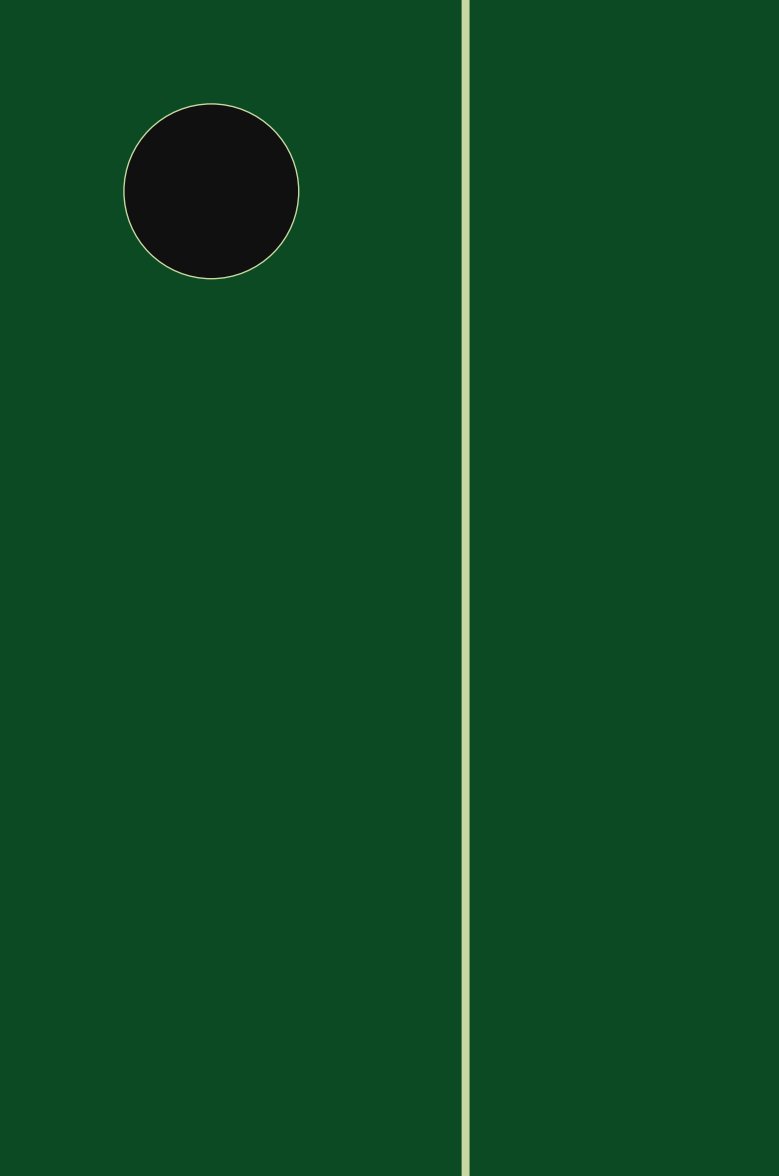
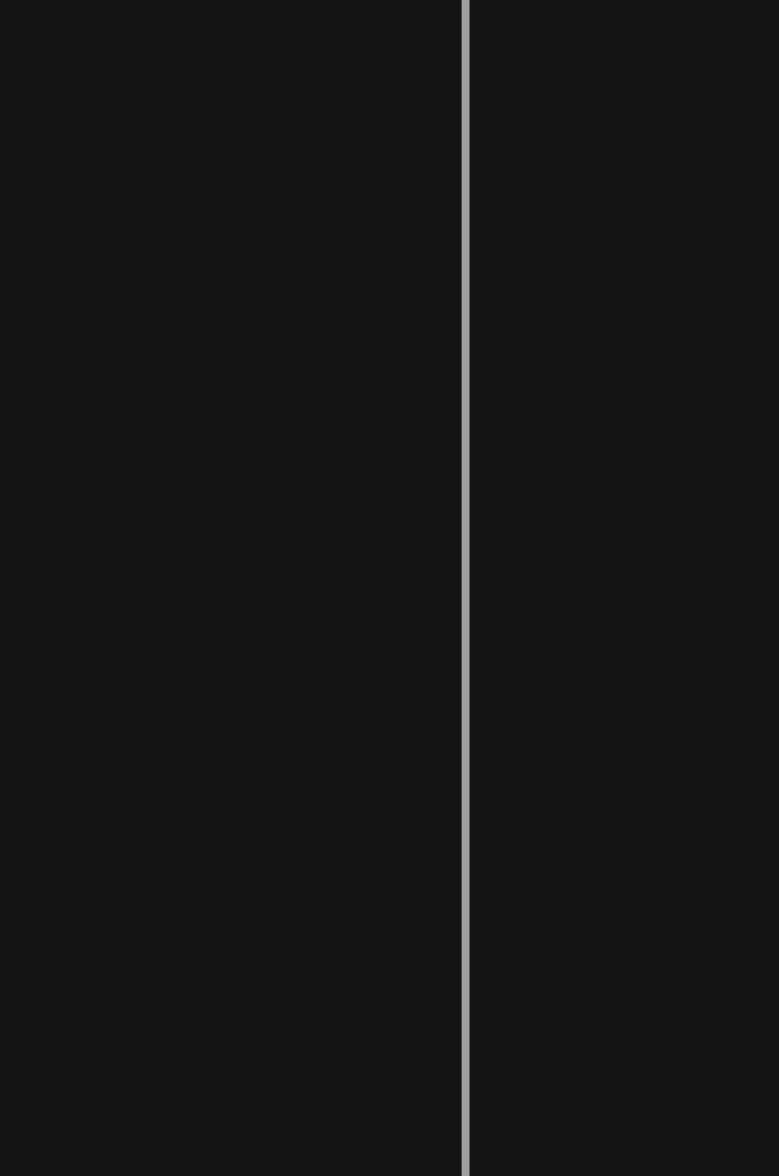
part: (211, 191) -> none

